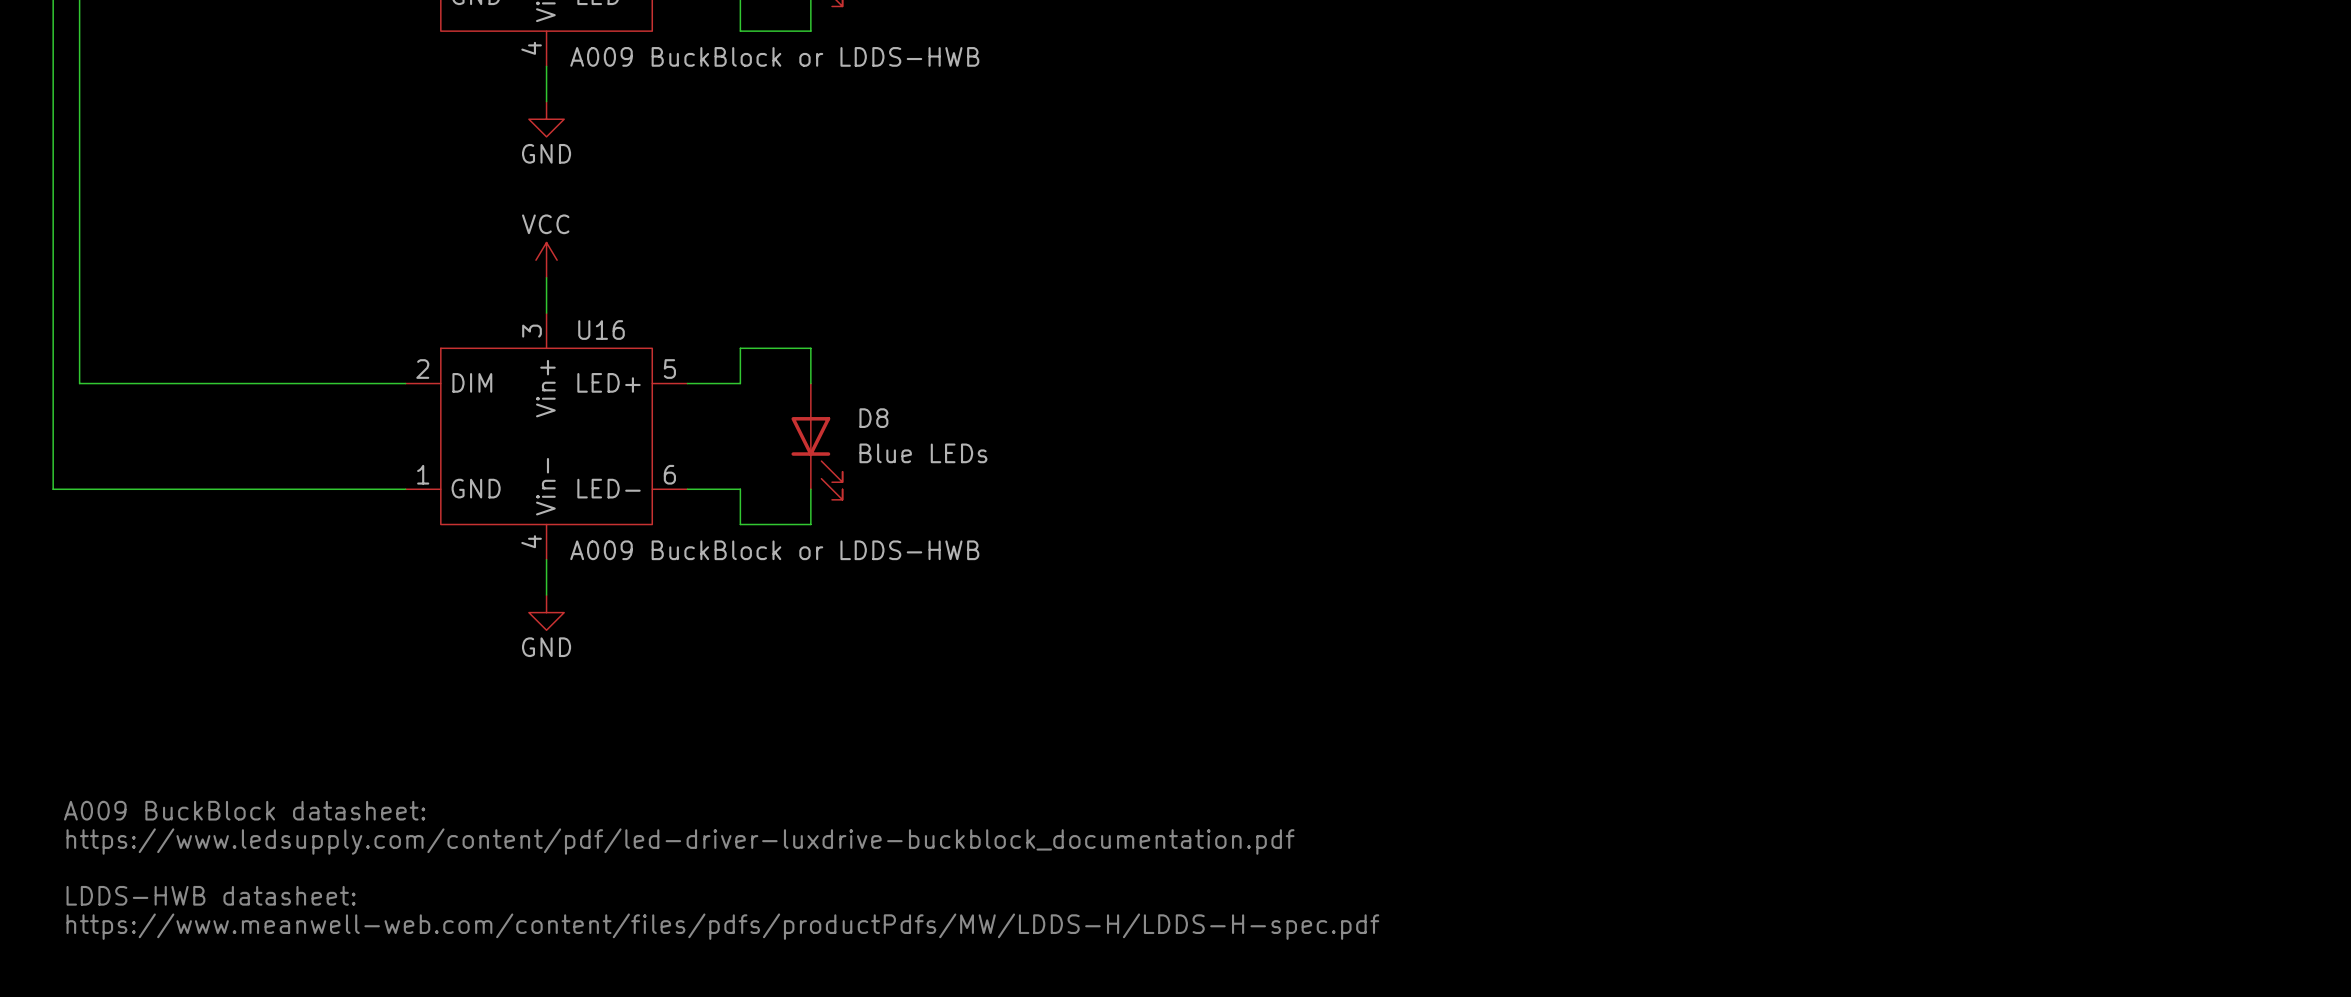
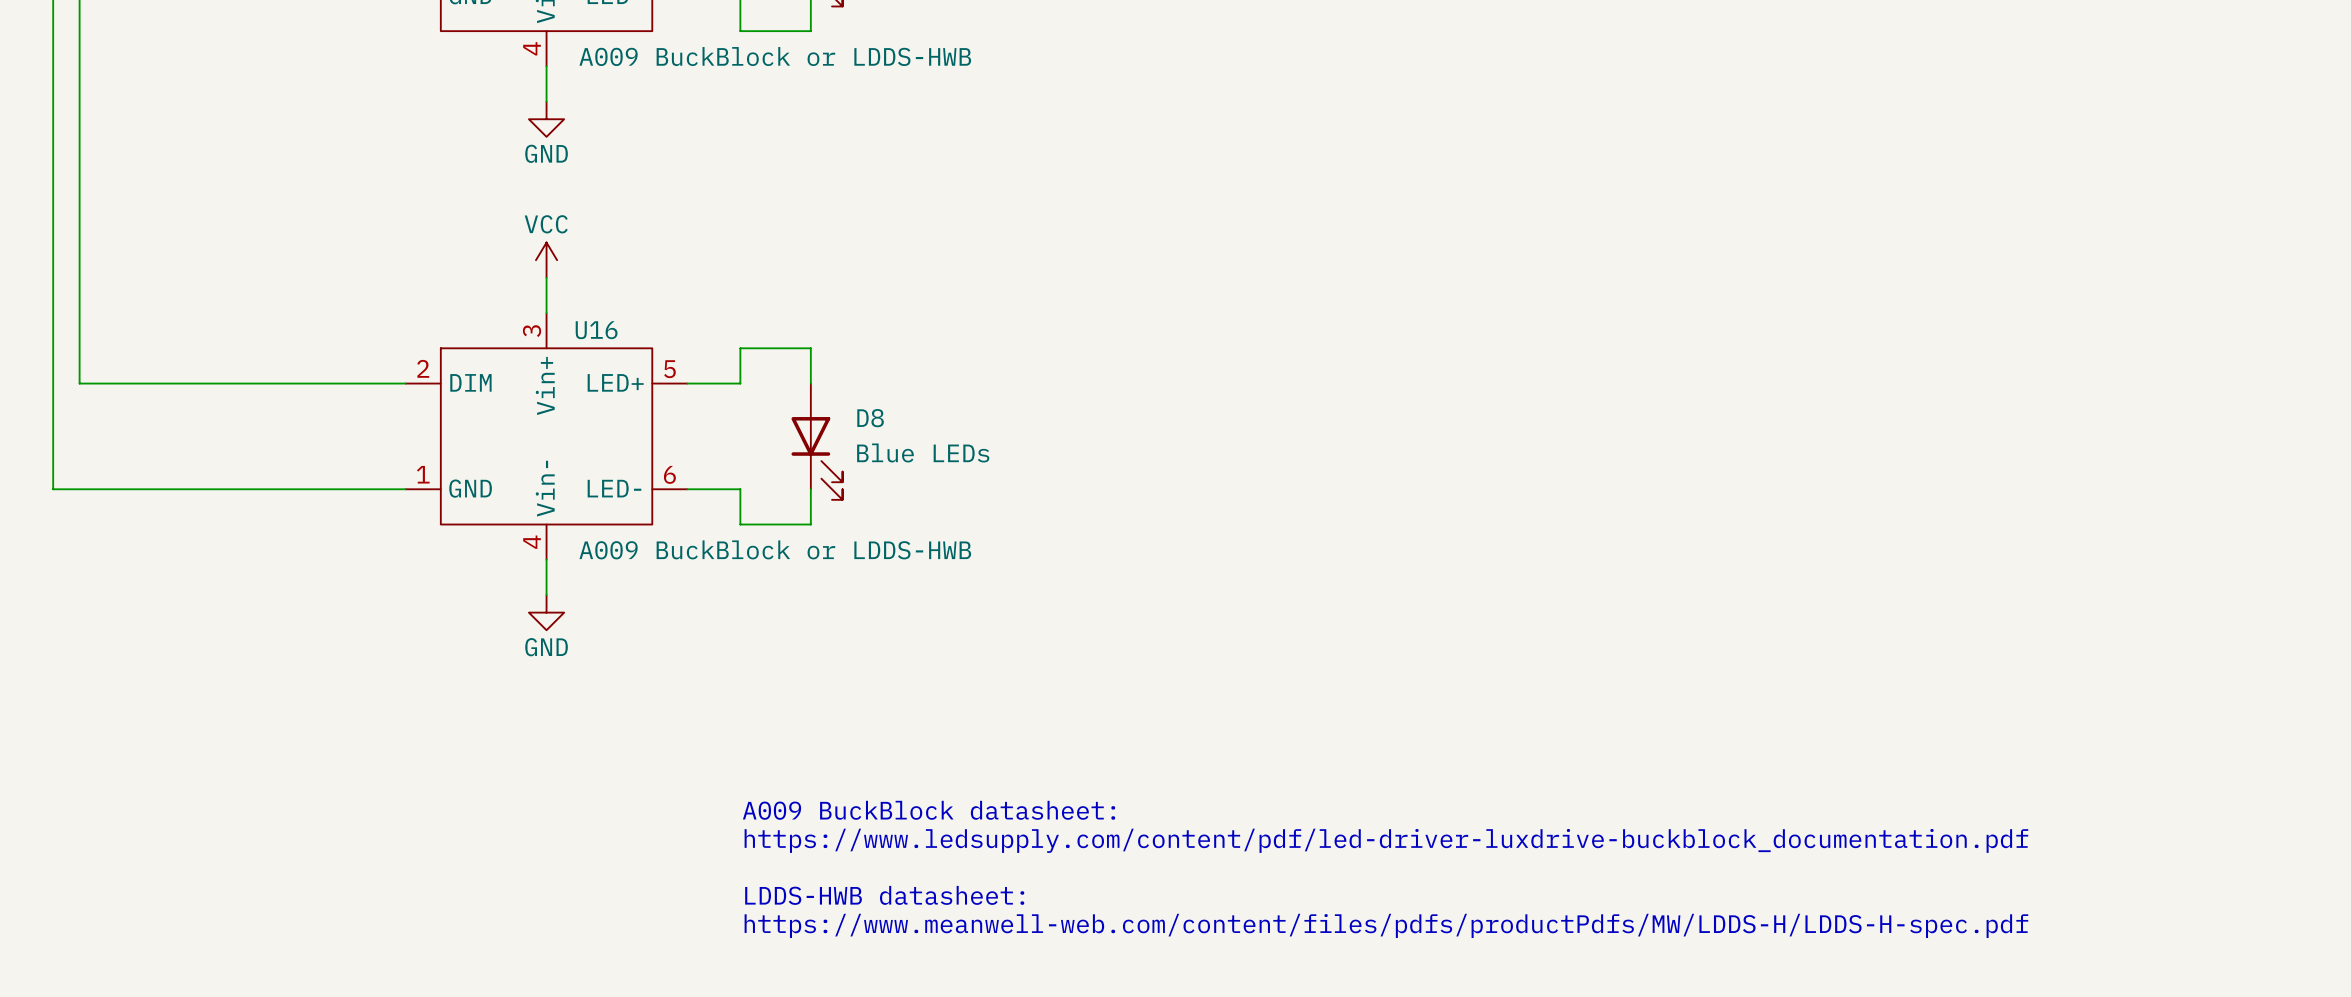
text: A009 BuckBlock datasheet: (244, 810) -> none
text: none -> A009 BuckBlock datasheet: (929, 810)
text: https://www.ledsupply.com/content/pdf/led-driver-luxdrive-buckblock_documentation.pdf (680, 841) -> none
text: none -> https://www.ledsupply.com/content/pdf/led-driver-luxdrive-buckblock_documentation.pdf (1386, 840)
text: LDDS-HWB datasheet: (211, 895) -> none
text: none -> LDDS-HWB datasheet: (884, 895)
text: https://www.meanwell-web.com/content/files/pdfs/productPdfs/MW/LDDS-H/LDDS-H-spec.pdf (722, 926) -> none
text: none -> https://www.meanwell-web.com/content/files/pdfs/productPdfs/MW/LDDS-H/LDDS-H-spec.pdf (1386, 925)

